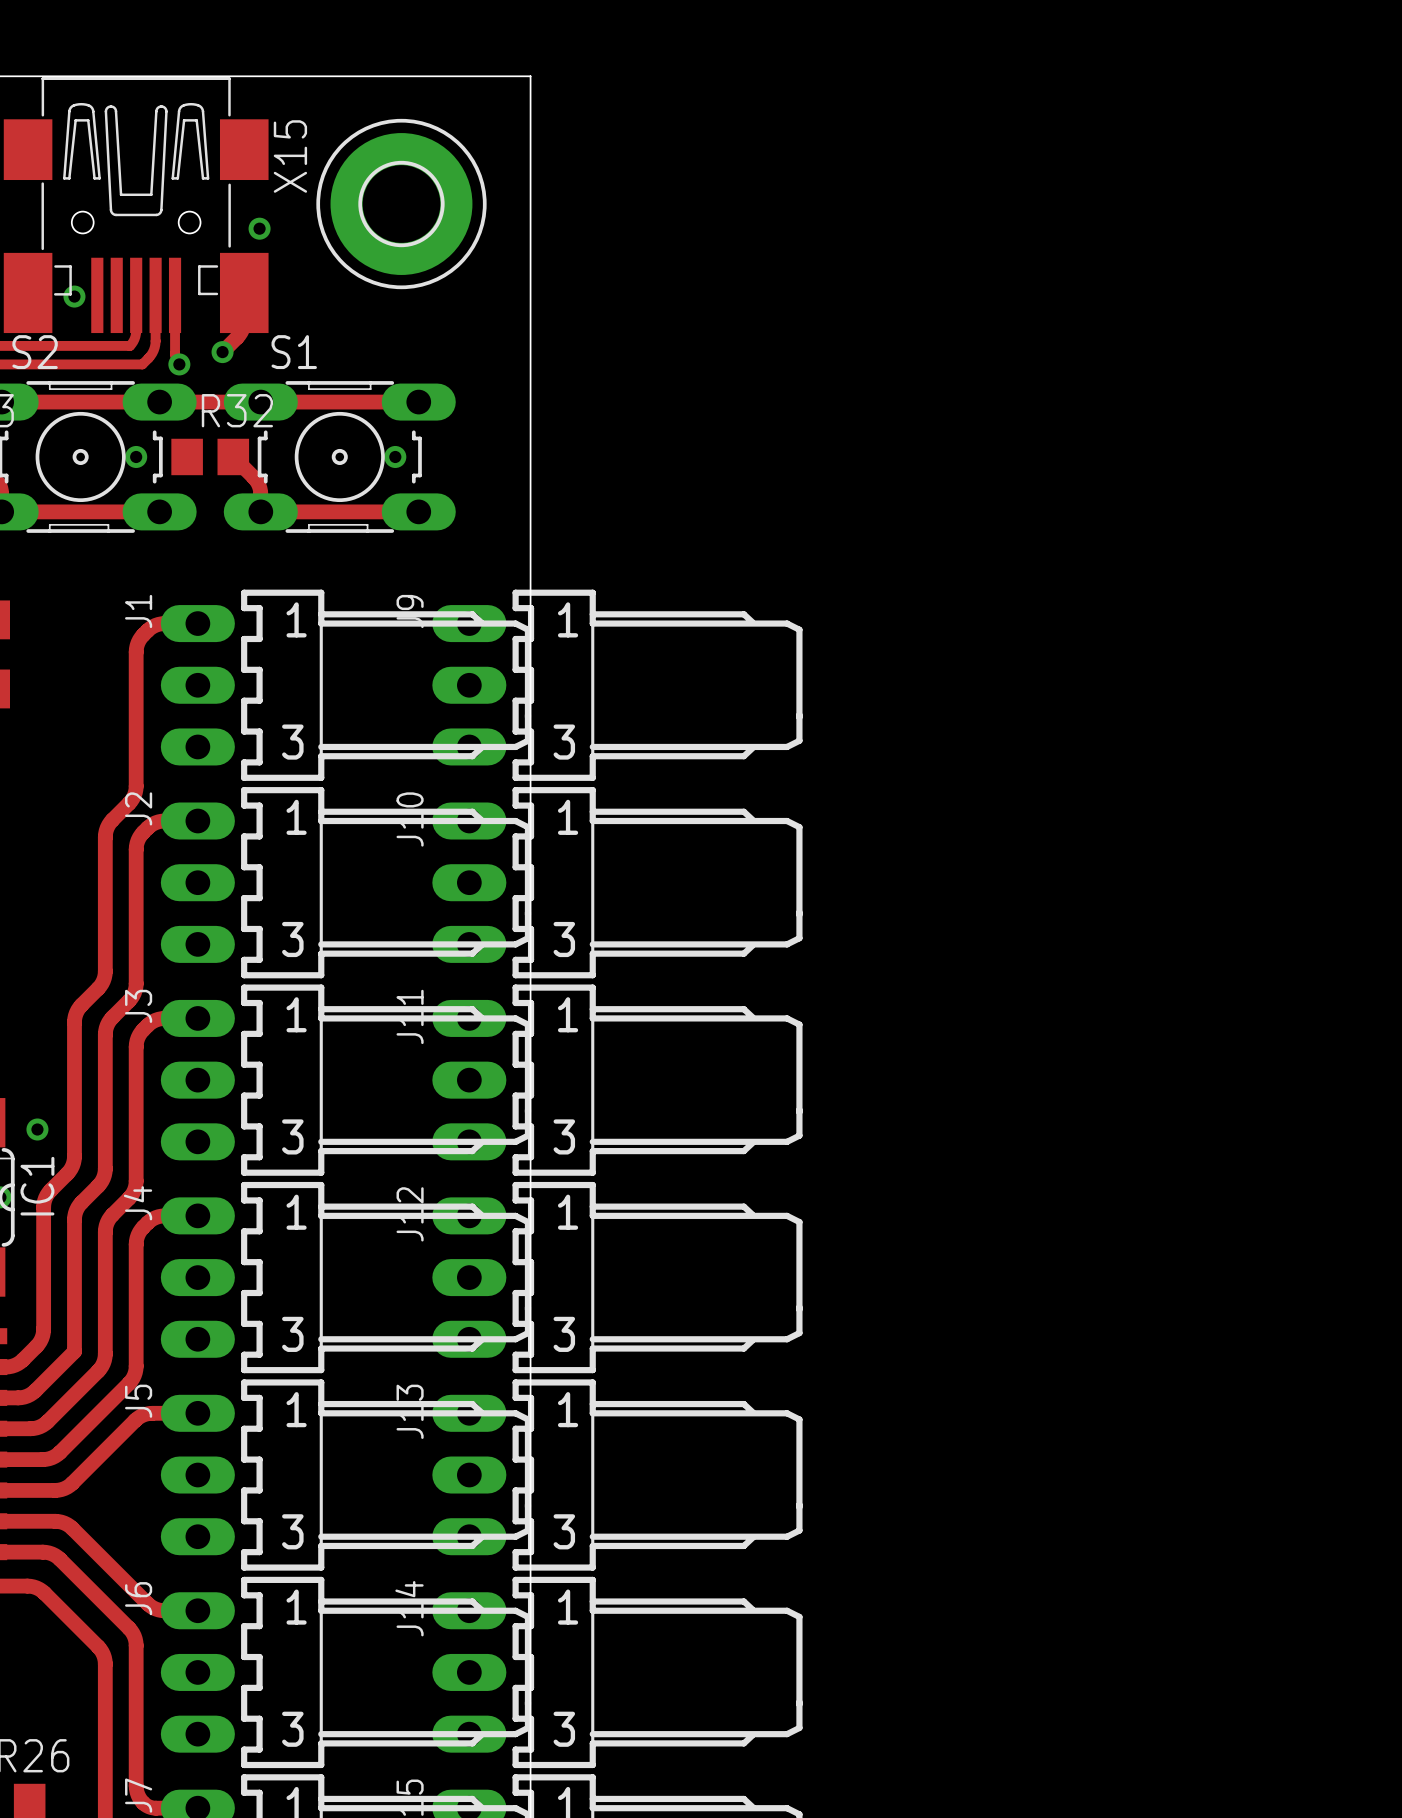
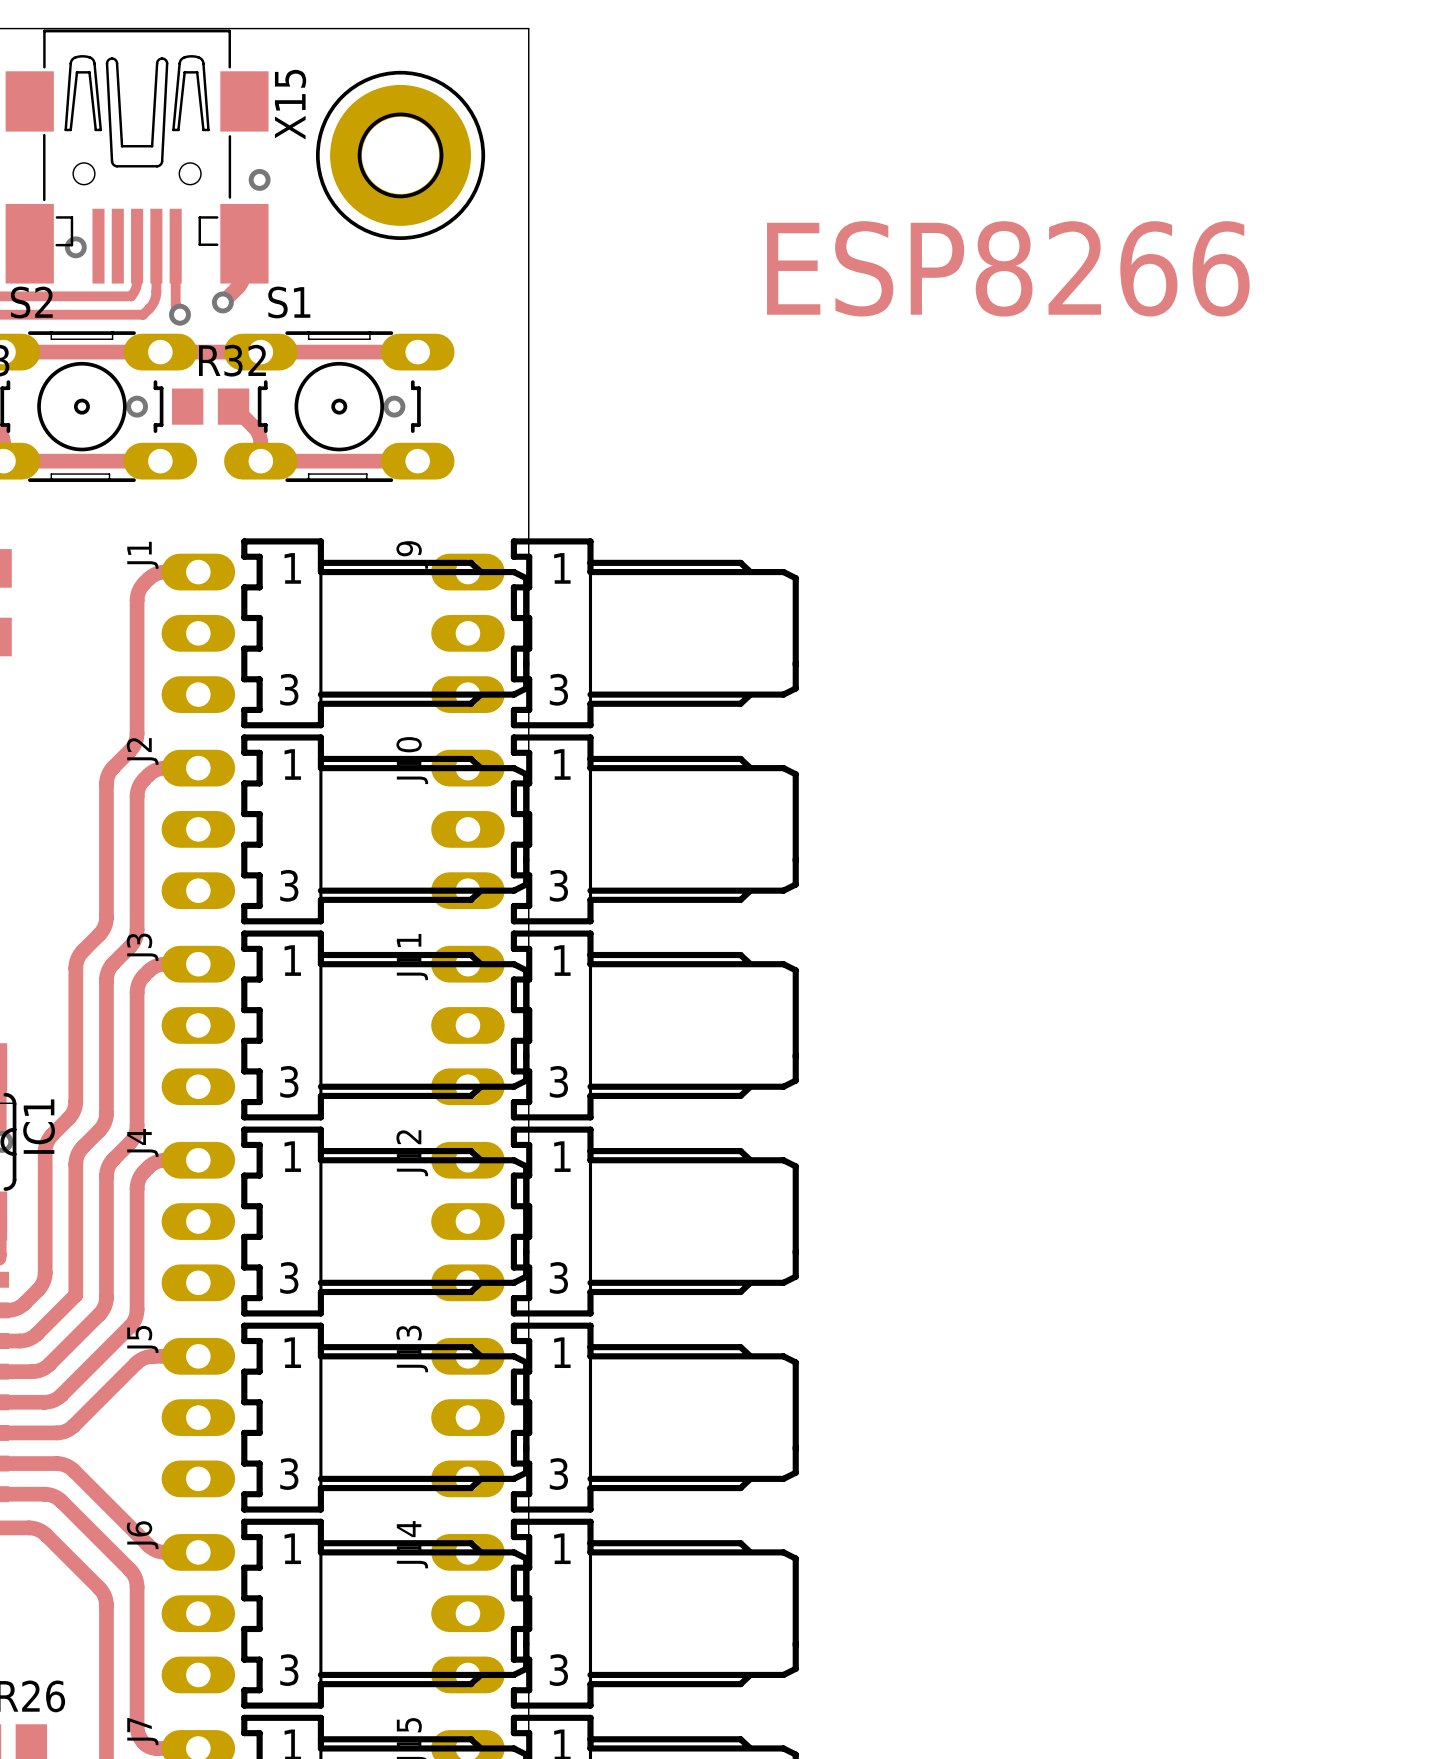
text: none -> ESP8266 (1008, 268)
via: (37, 1129) -> none

